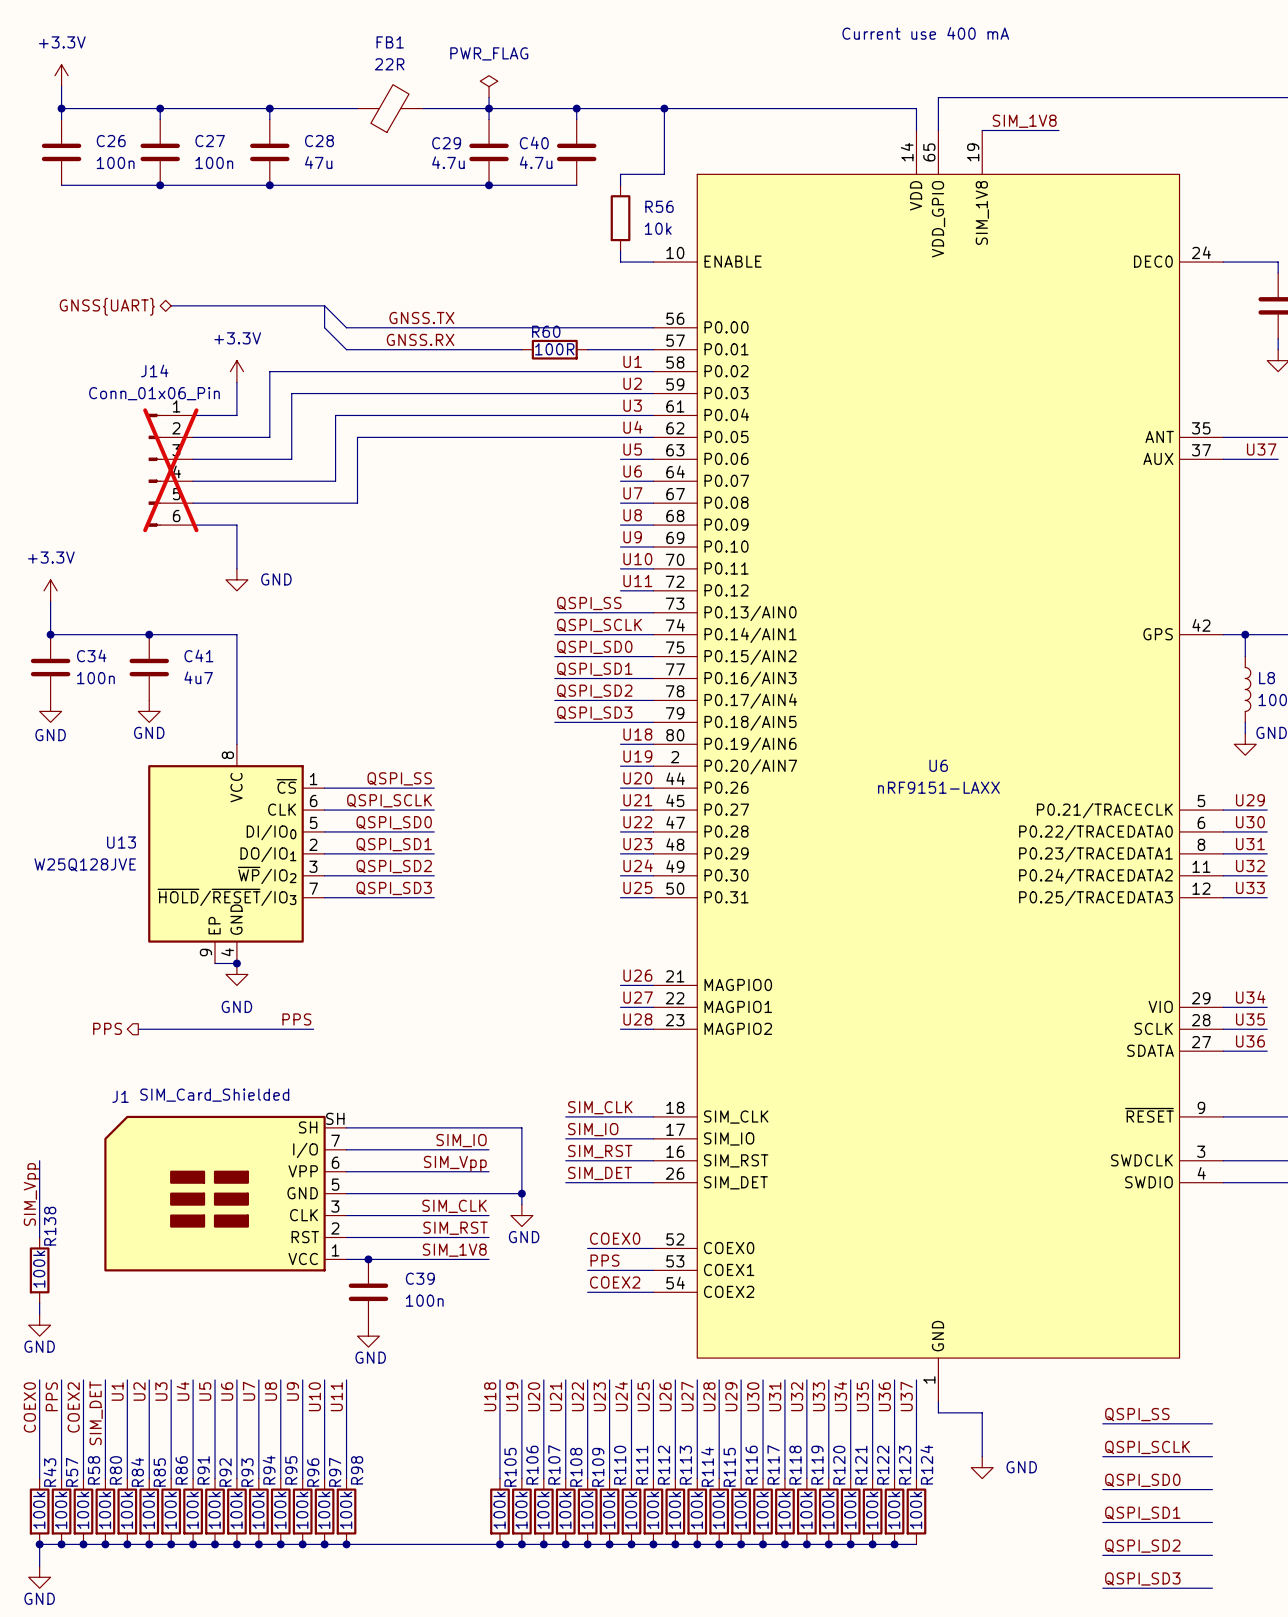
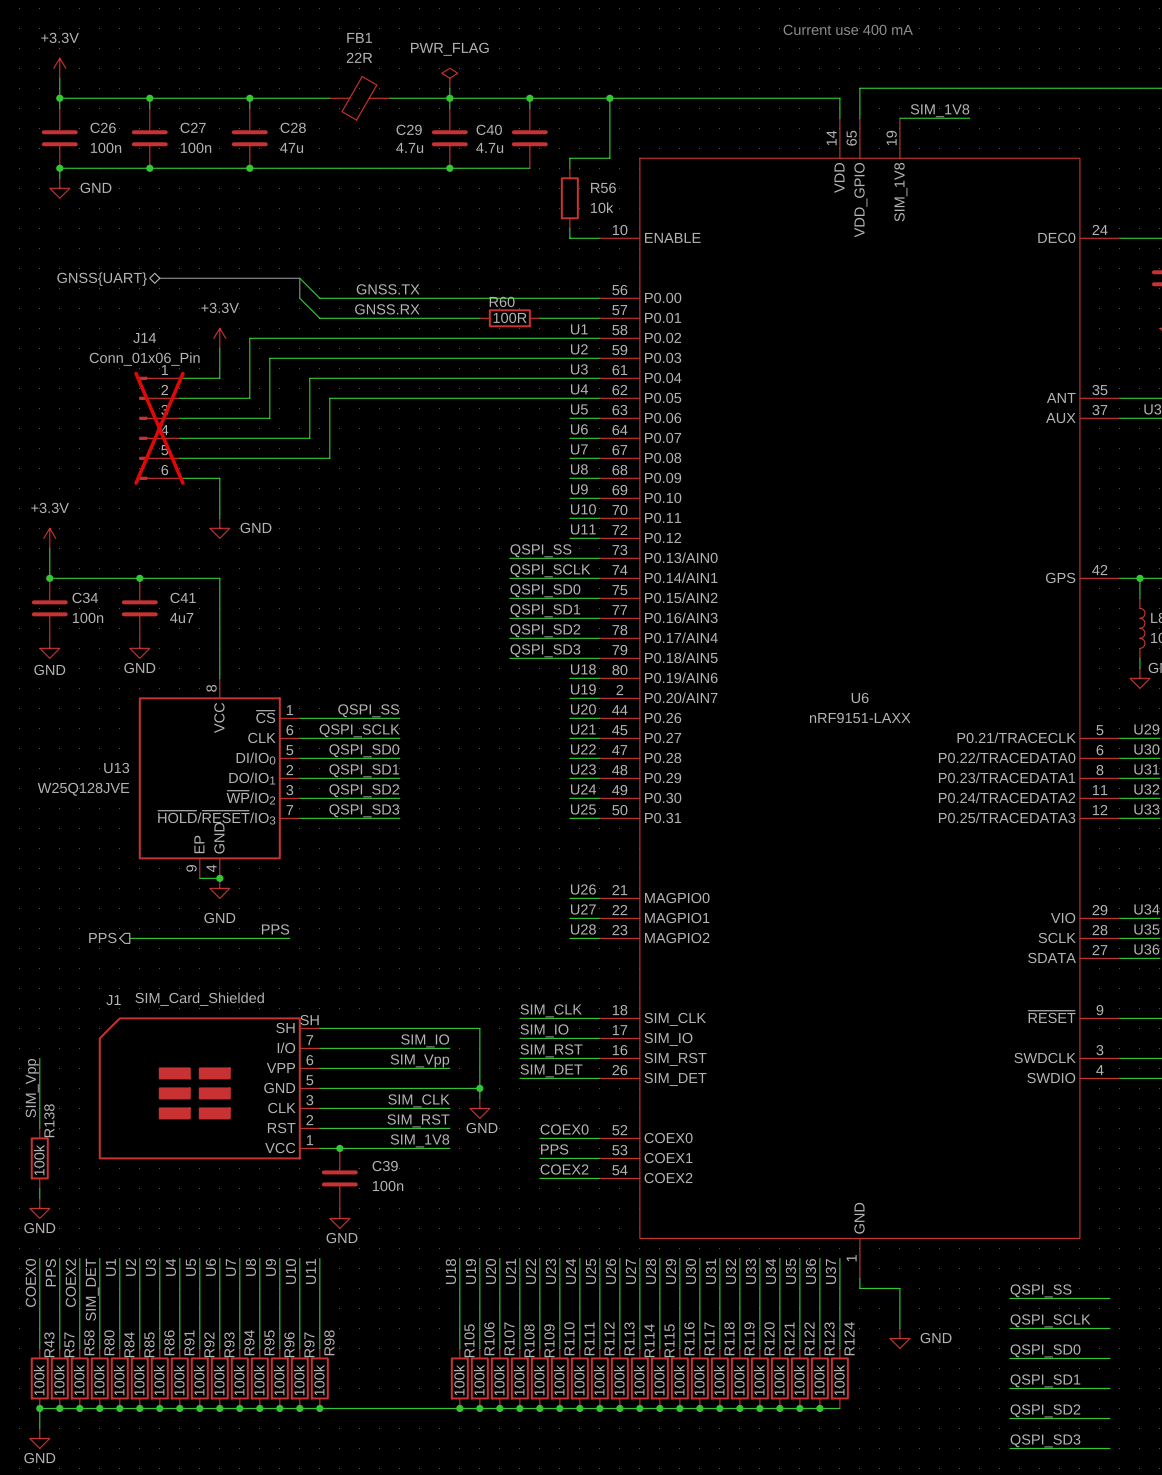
wire: none -> (59, 168) (59, 178)
junction: none -> (59, 168)
power symbol: none -> GND (59, 188)

